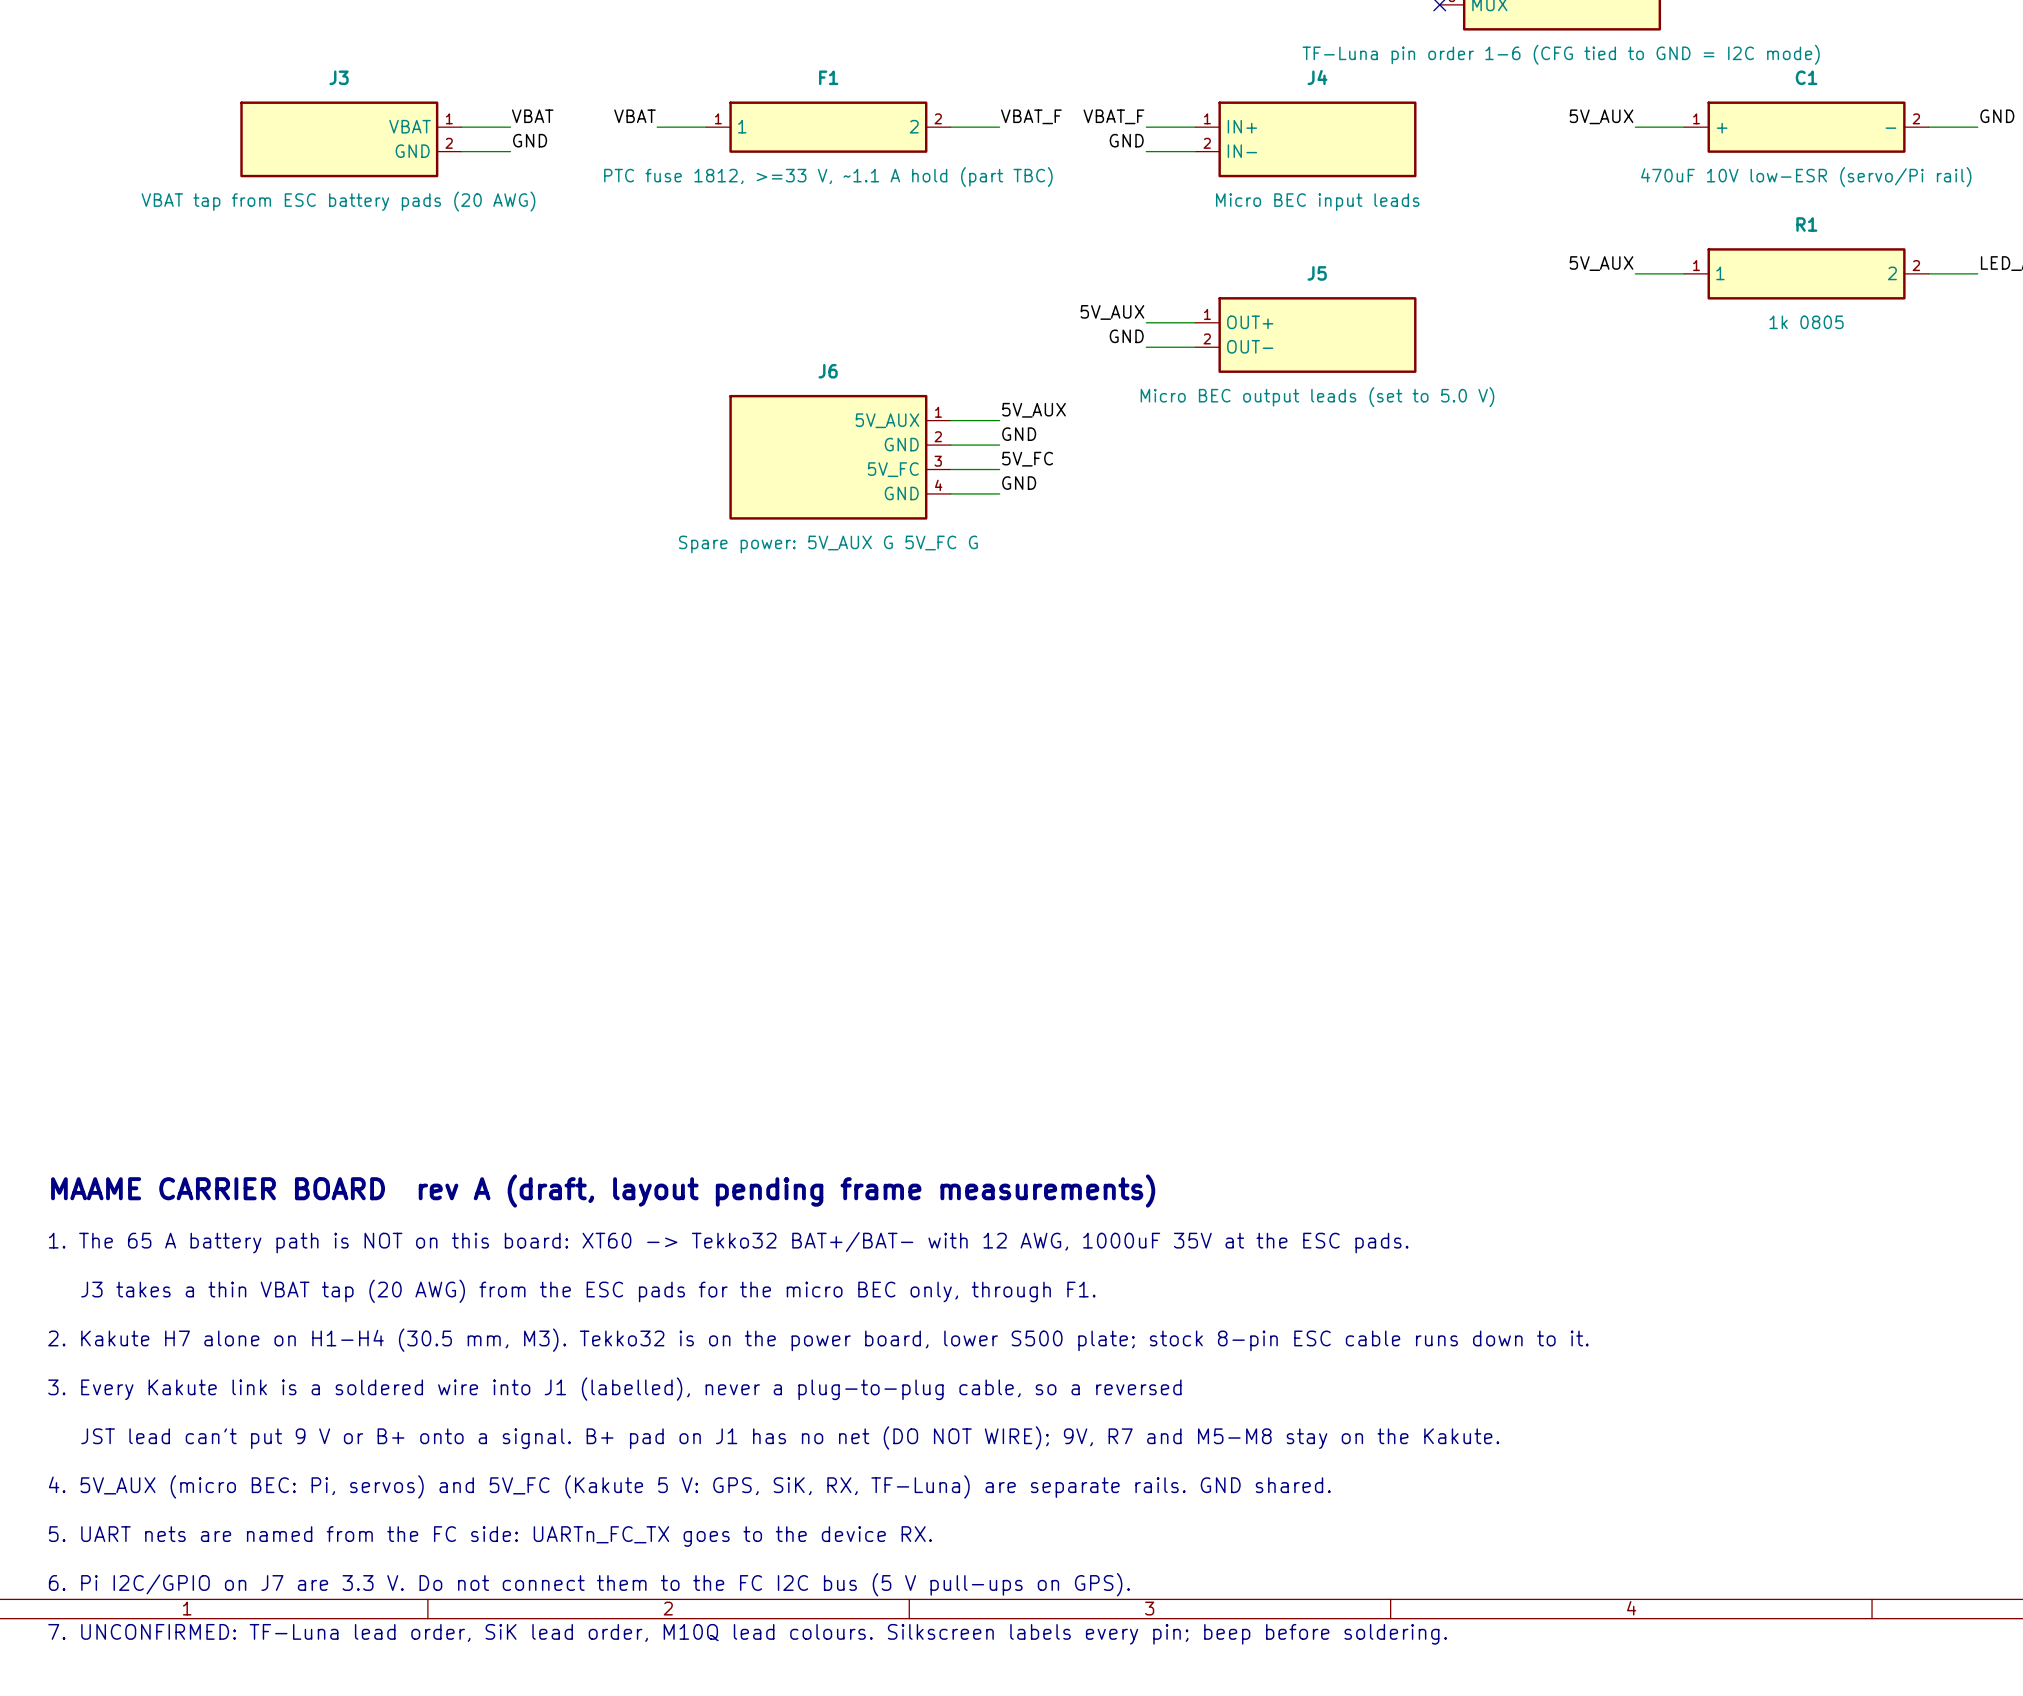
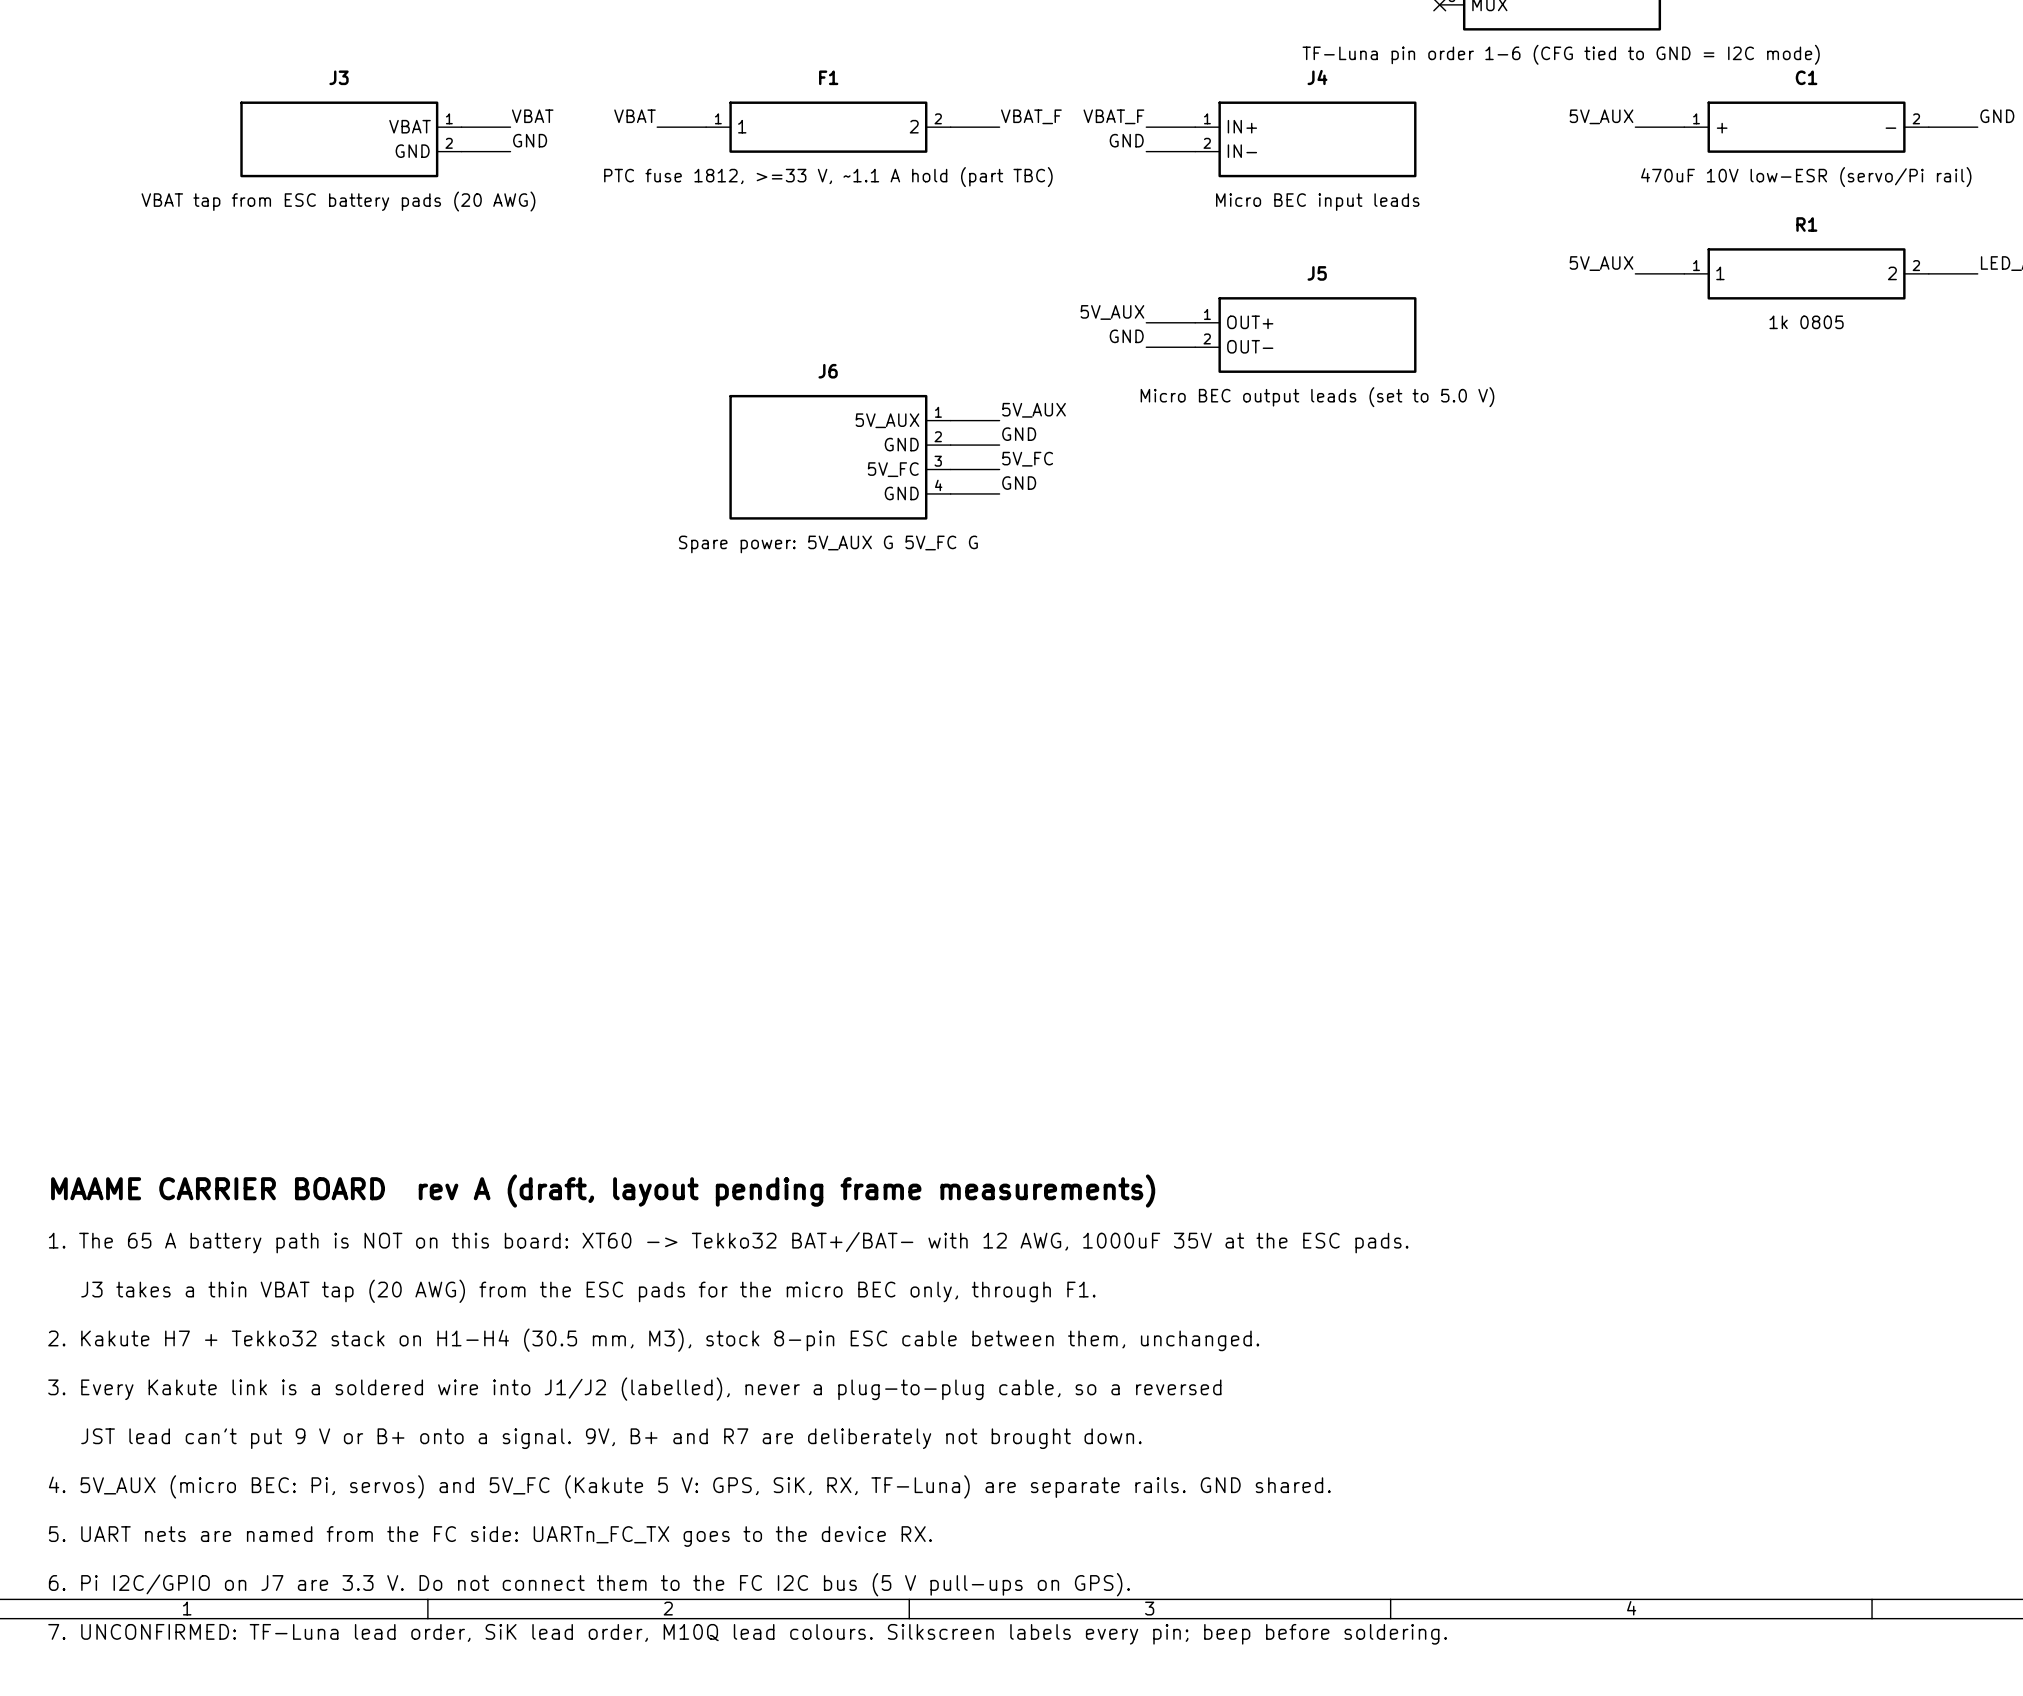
text: 2. Kakute H7 alone on H1-H4 (30.5 mm, M3). Tekko32 is on the power board, lower S500 plate; stock 8-pin ESC cable runs down to it. (818, 1340) -> 2. Kakute H7 + Tekko32 stack on H1-H4 (30.5 mm, M3), stock 8-pin ESC cable between them, unchanged. (653, 1340)
text: 3. Every Kakute link is a soldered wire into J1 (labelled), never a plug-to-plug cable, so a reversed (614, 1389) -> 3. Every Kakute link is a soldered wire into J1/J2 (labelled), never a plug-to-plug cable, so a reversed (634, 1389)
text: JST lead can't put 9 V or B+ onto a signal. B+ pad on J1 has no net (DO NOT WIRE); 9V, R7 and M5-M8 stay on the Kakute. (790, 1437) -> JST lead can't put 9 V or B+ onto a signal. 9V, B+ and R7 are deliberately not brought down. (611, 1438)

